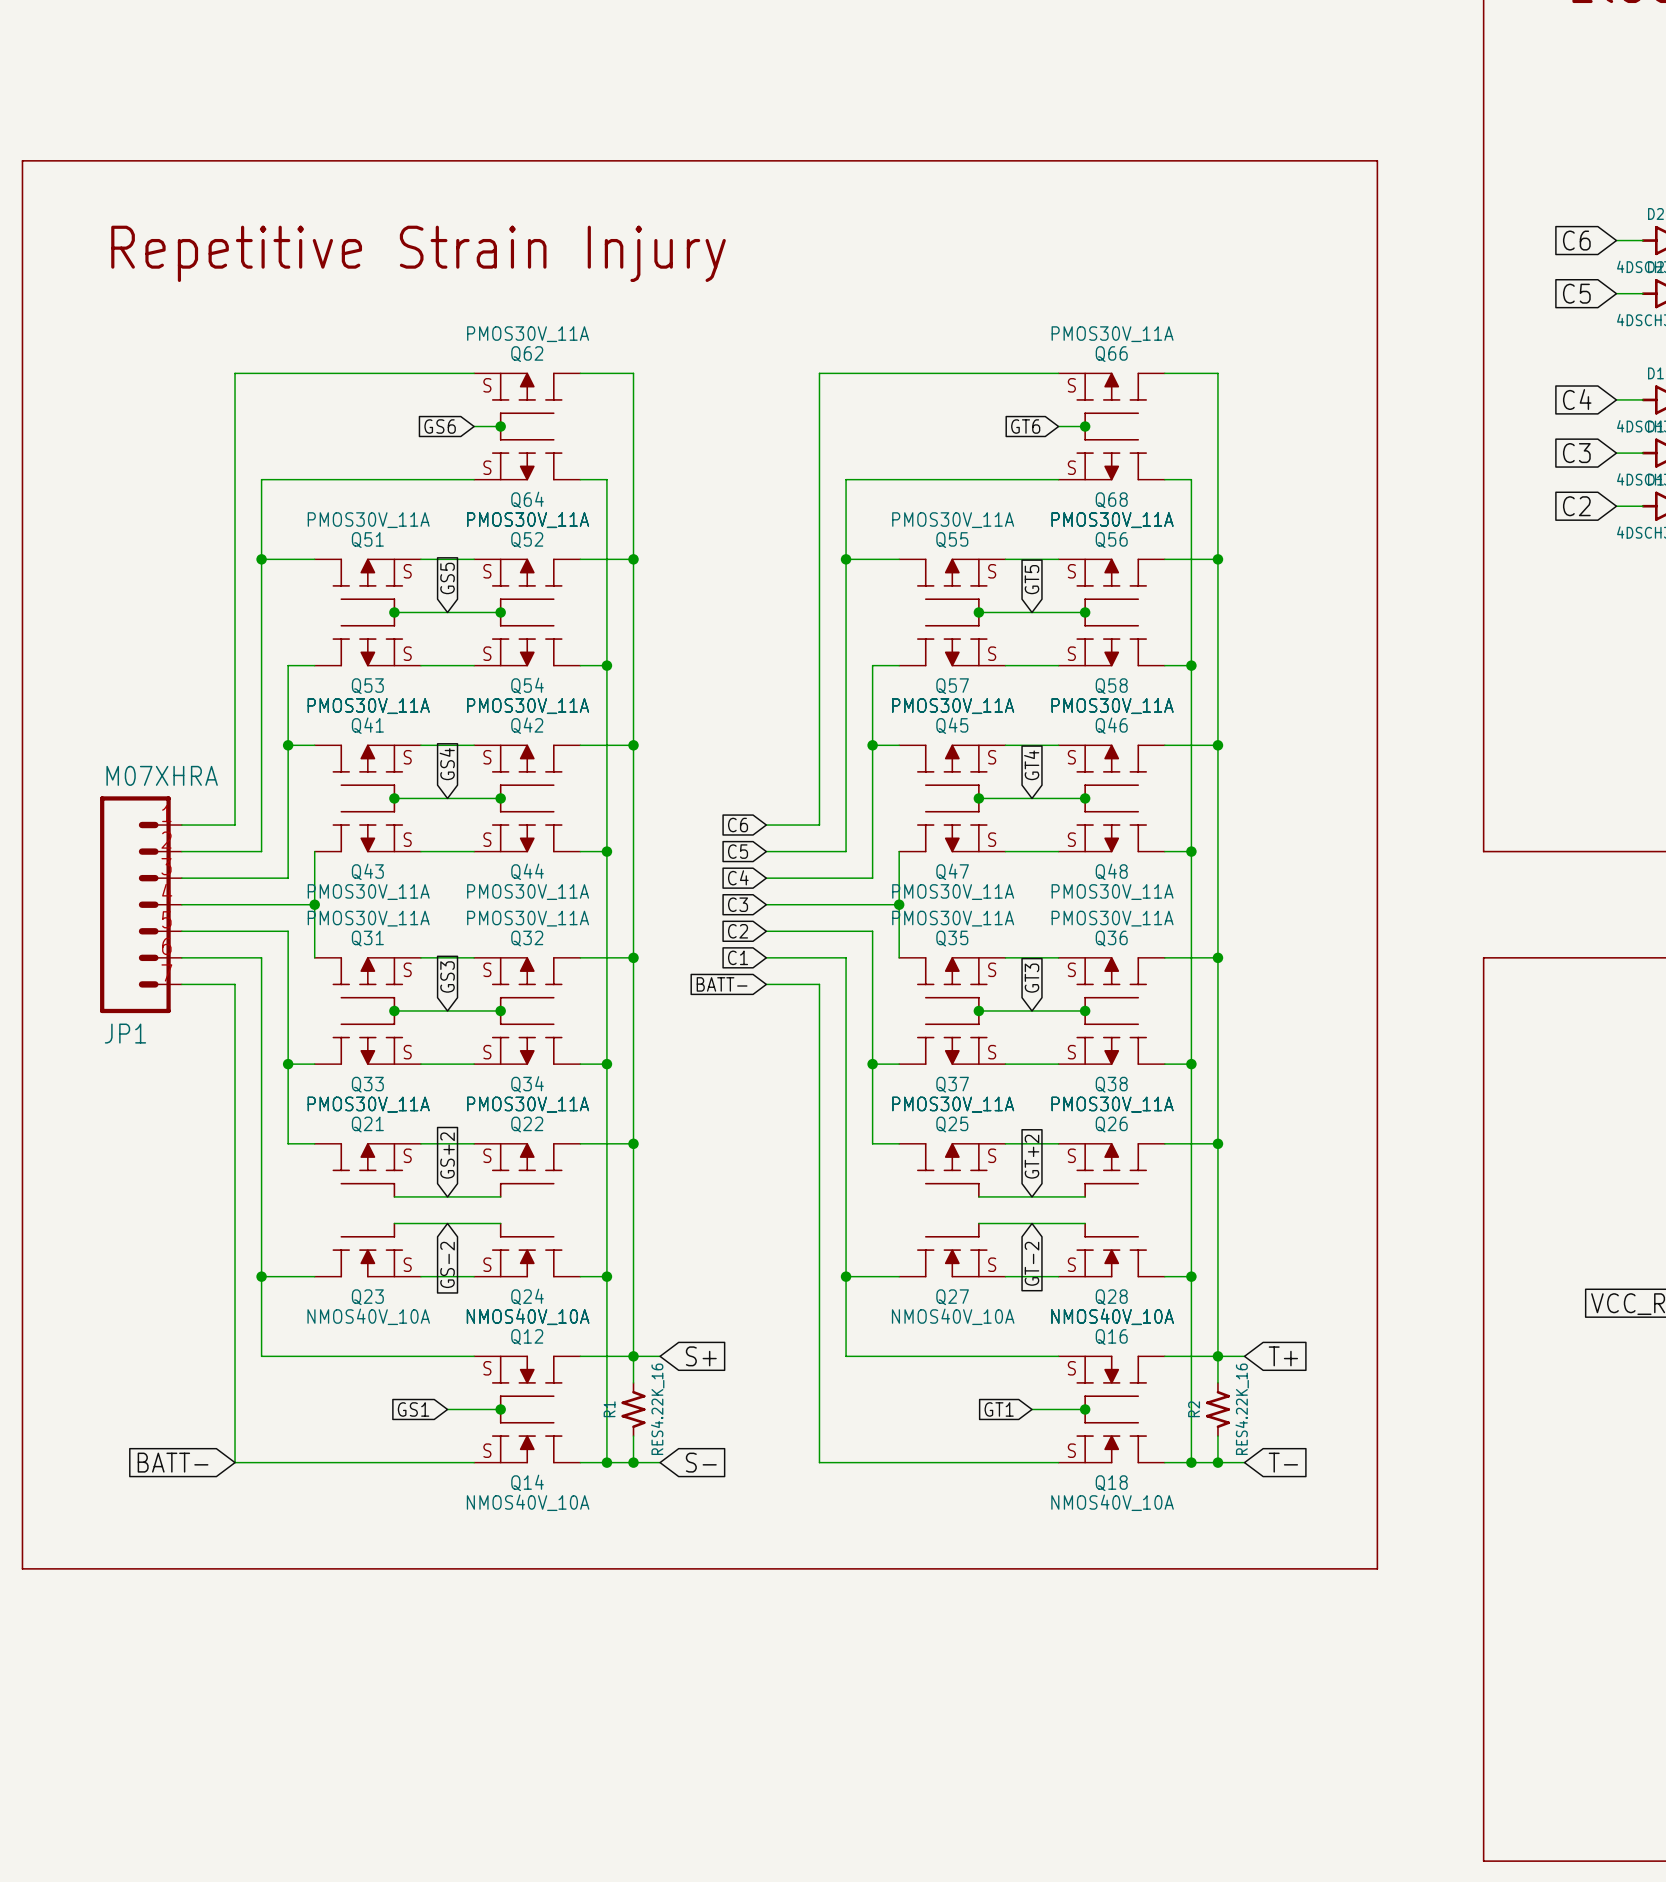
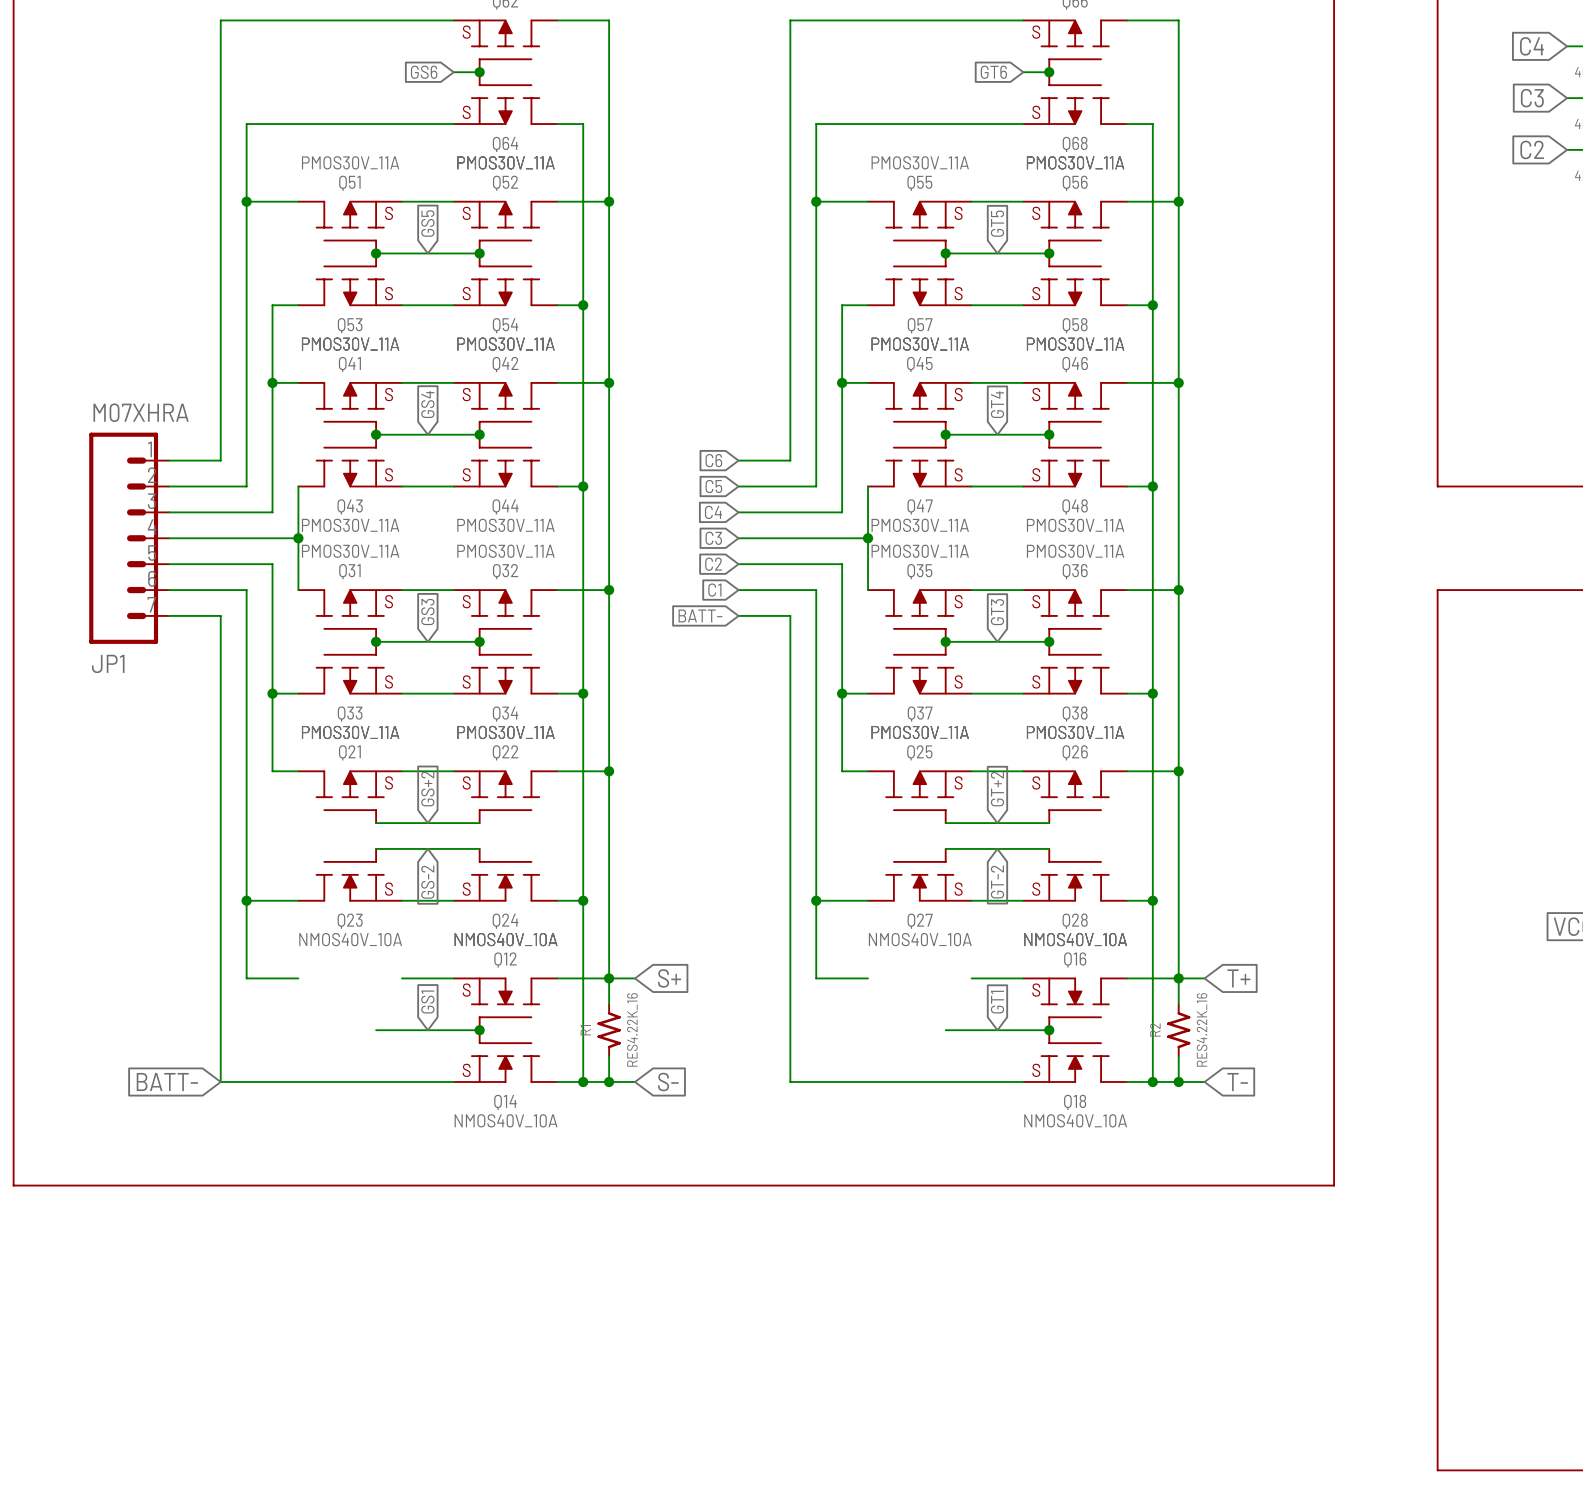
wire: (314, 1356) (420, 1356) -> none
wire: (899, 1356) (1005, 1356) -> none
wire: none -> (376, 1030) (427, 1030)
global label rotation: 0° (413, 1409) -> 90° clockwise (427, 1001)
wire: none -> (945, 1030) (997, 1030)
global label rotation: 0° (999, 1409) -> 90° clockwise (997, 1002)

